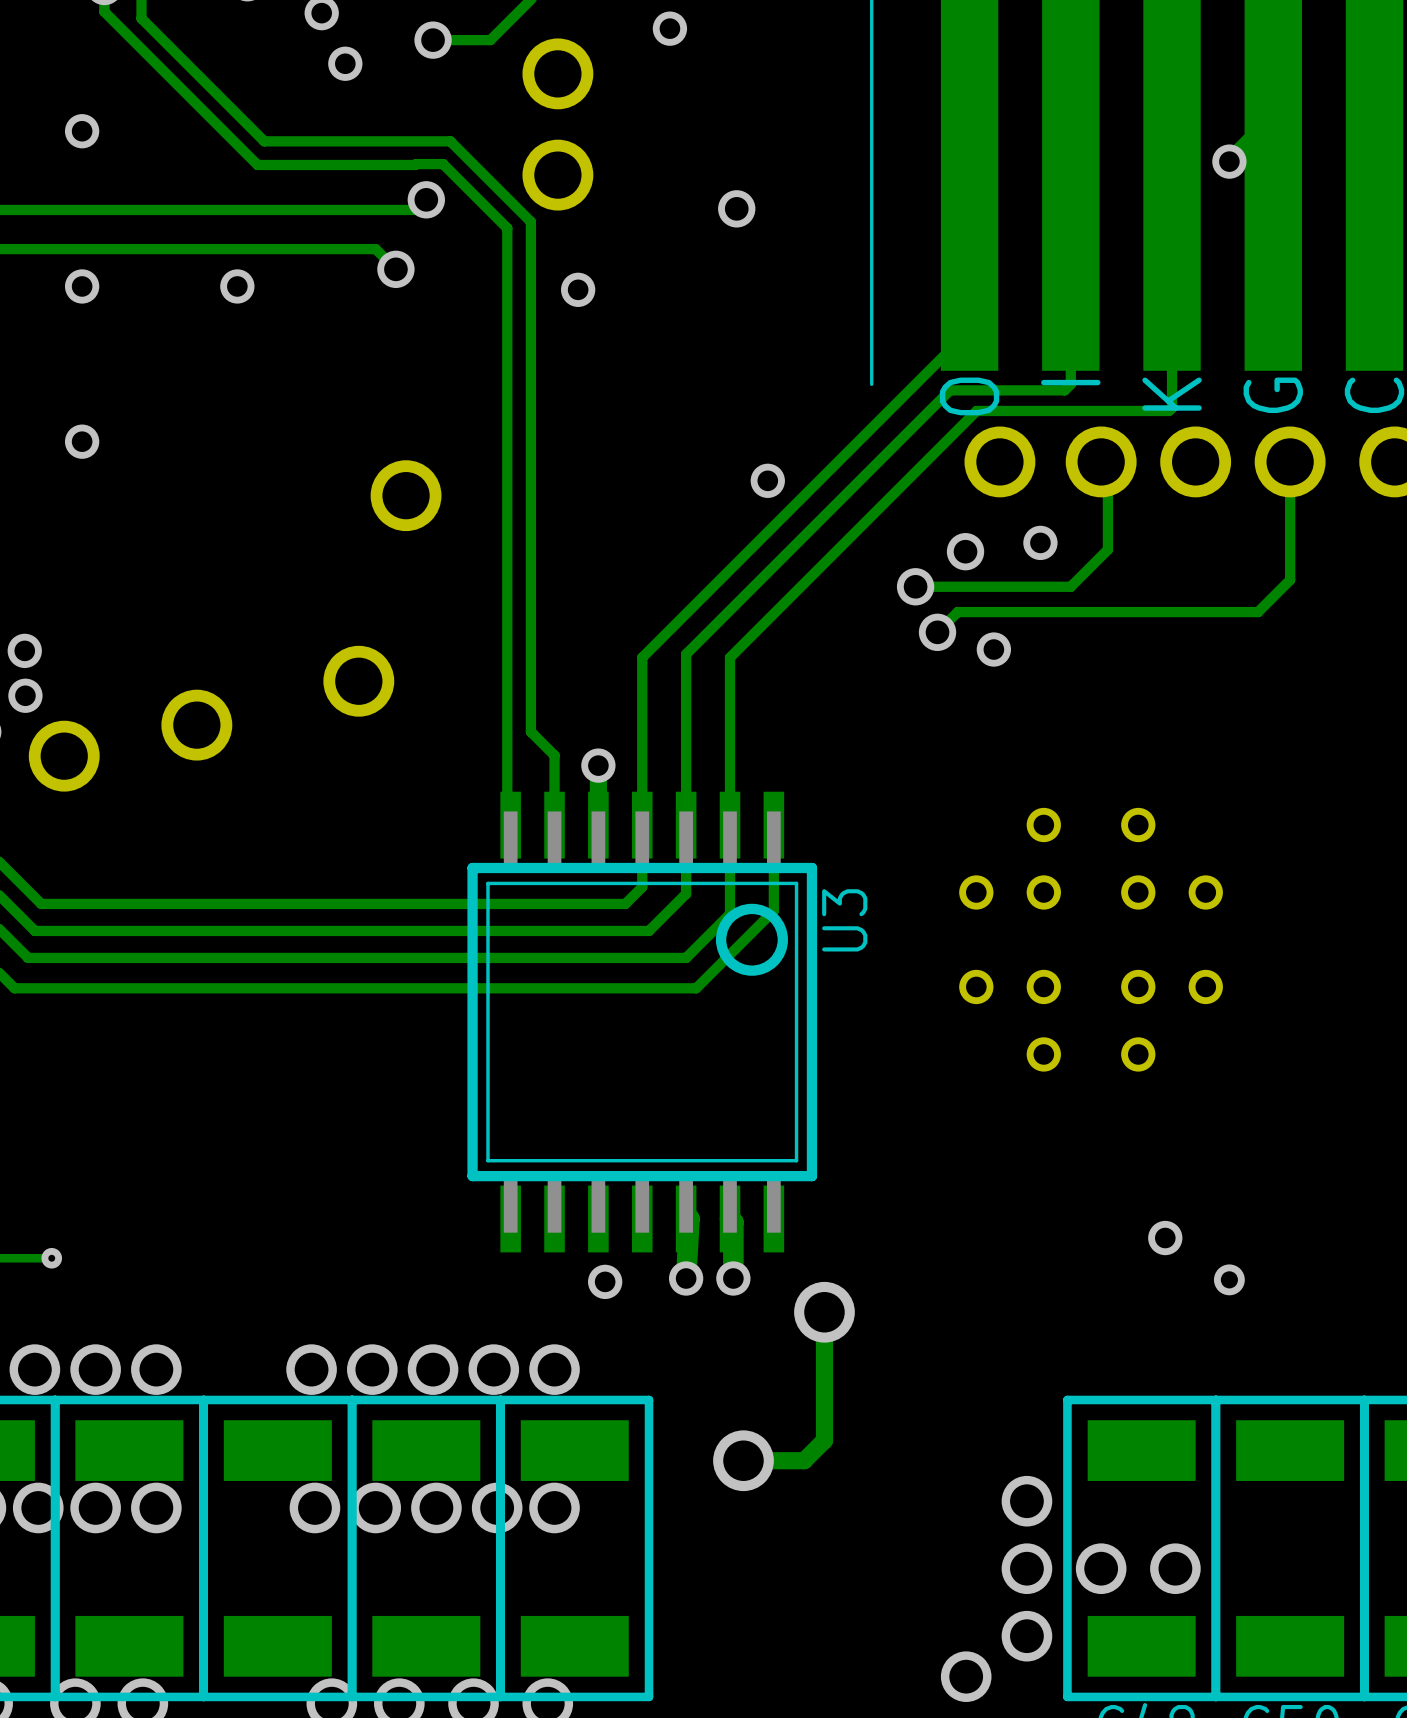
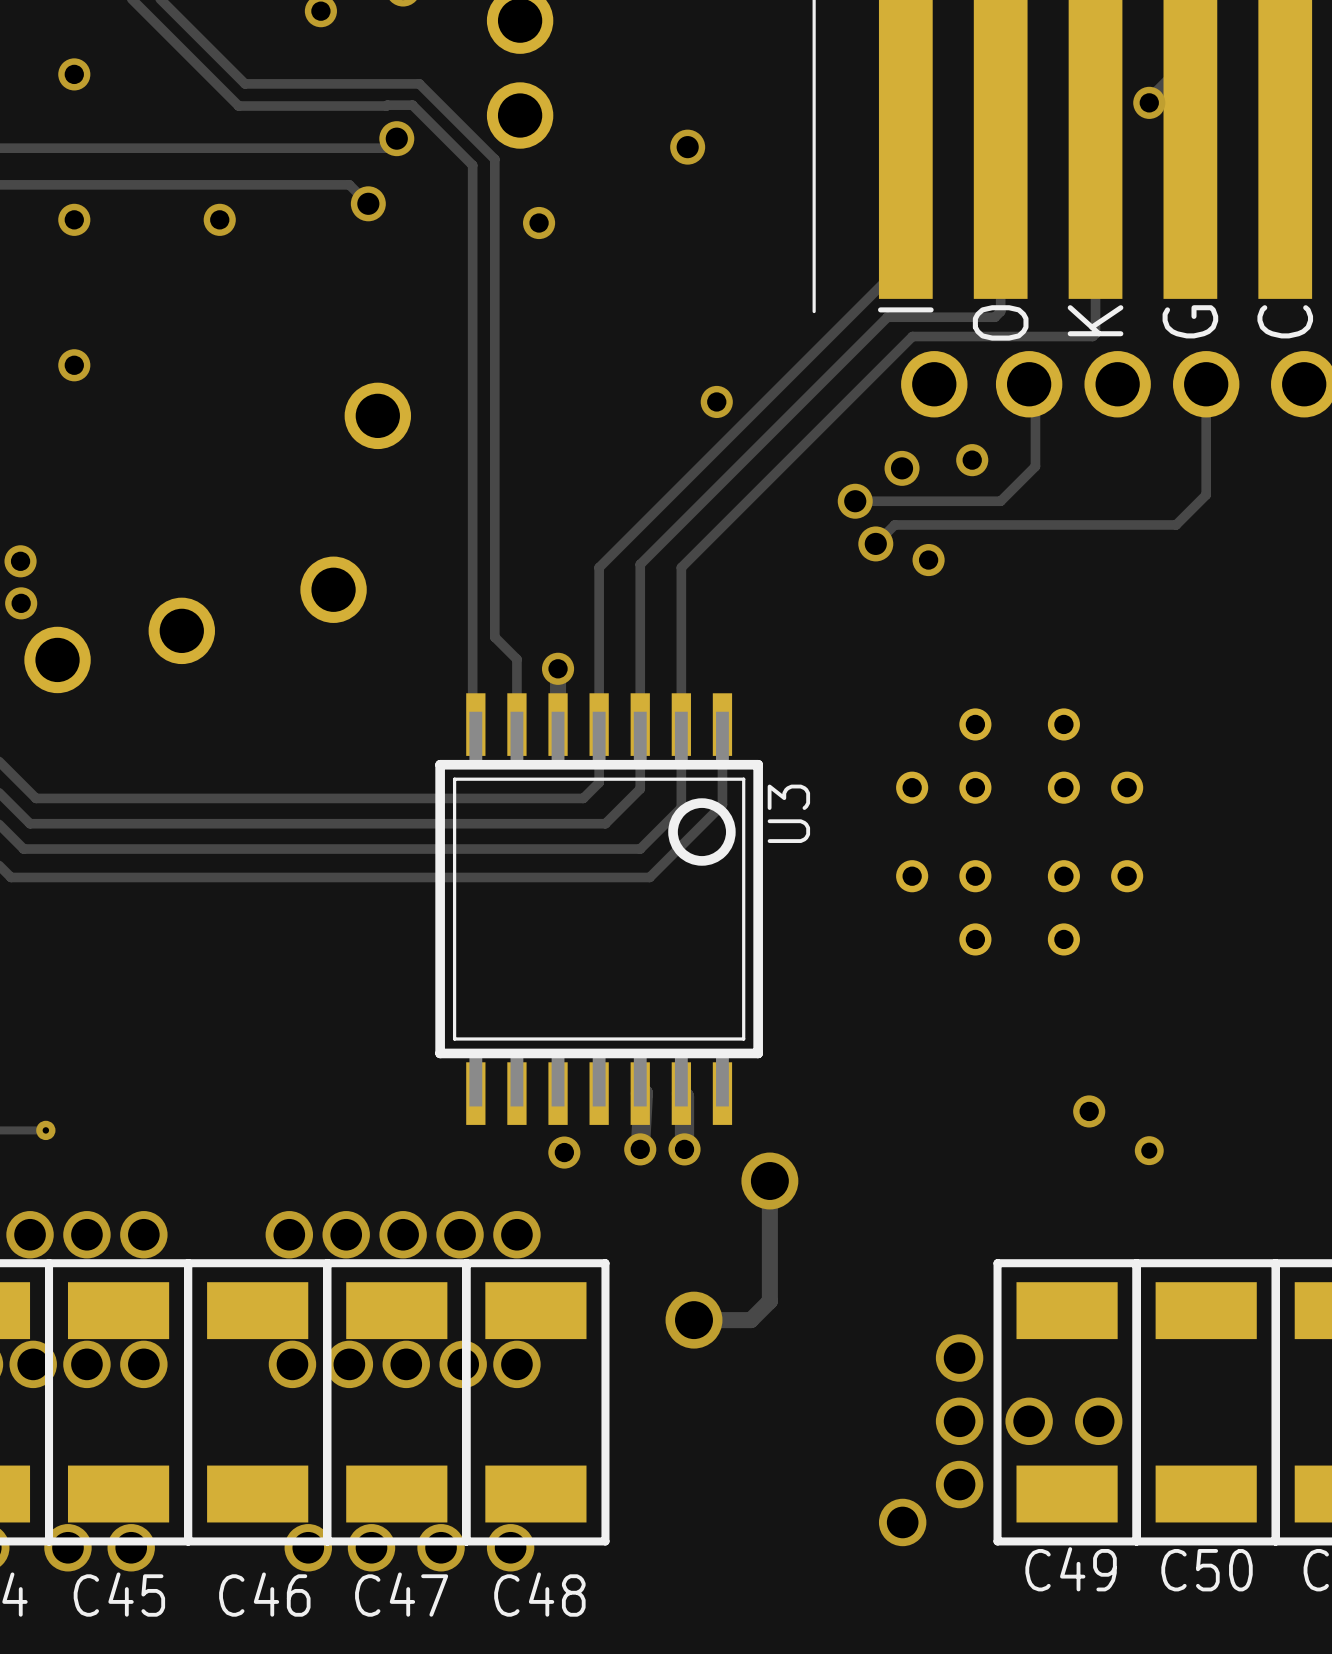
text: I (1070, 382) -> O (1000, 322)
text: O (969, 396) -> I (905, 309)

